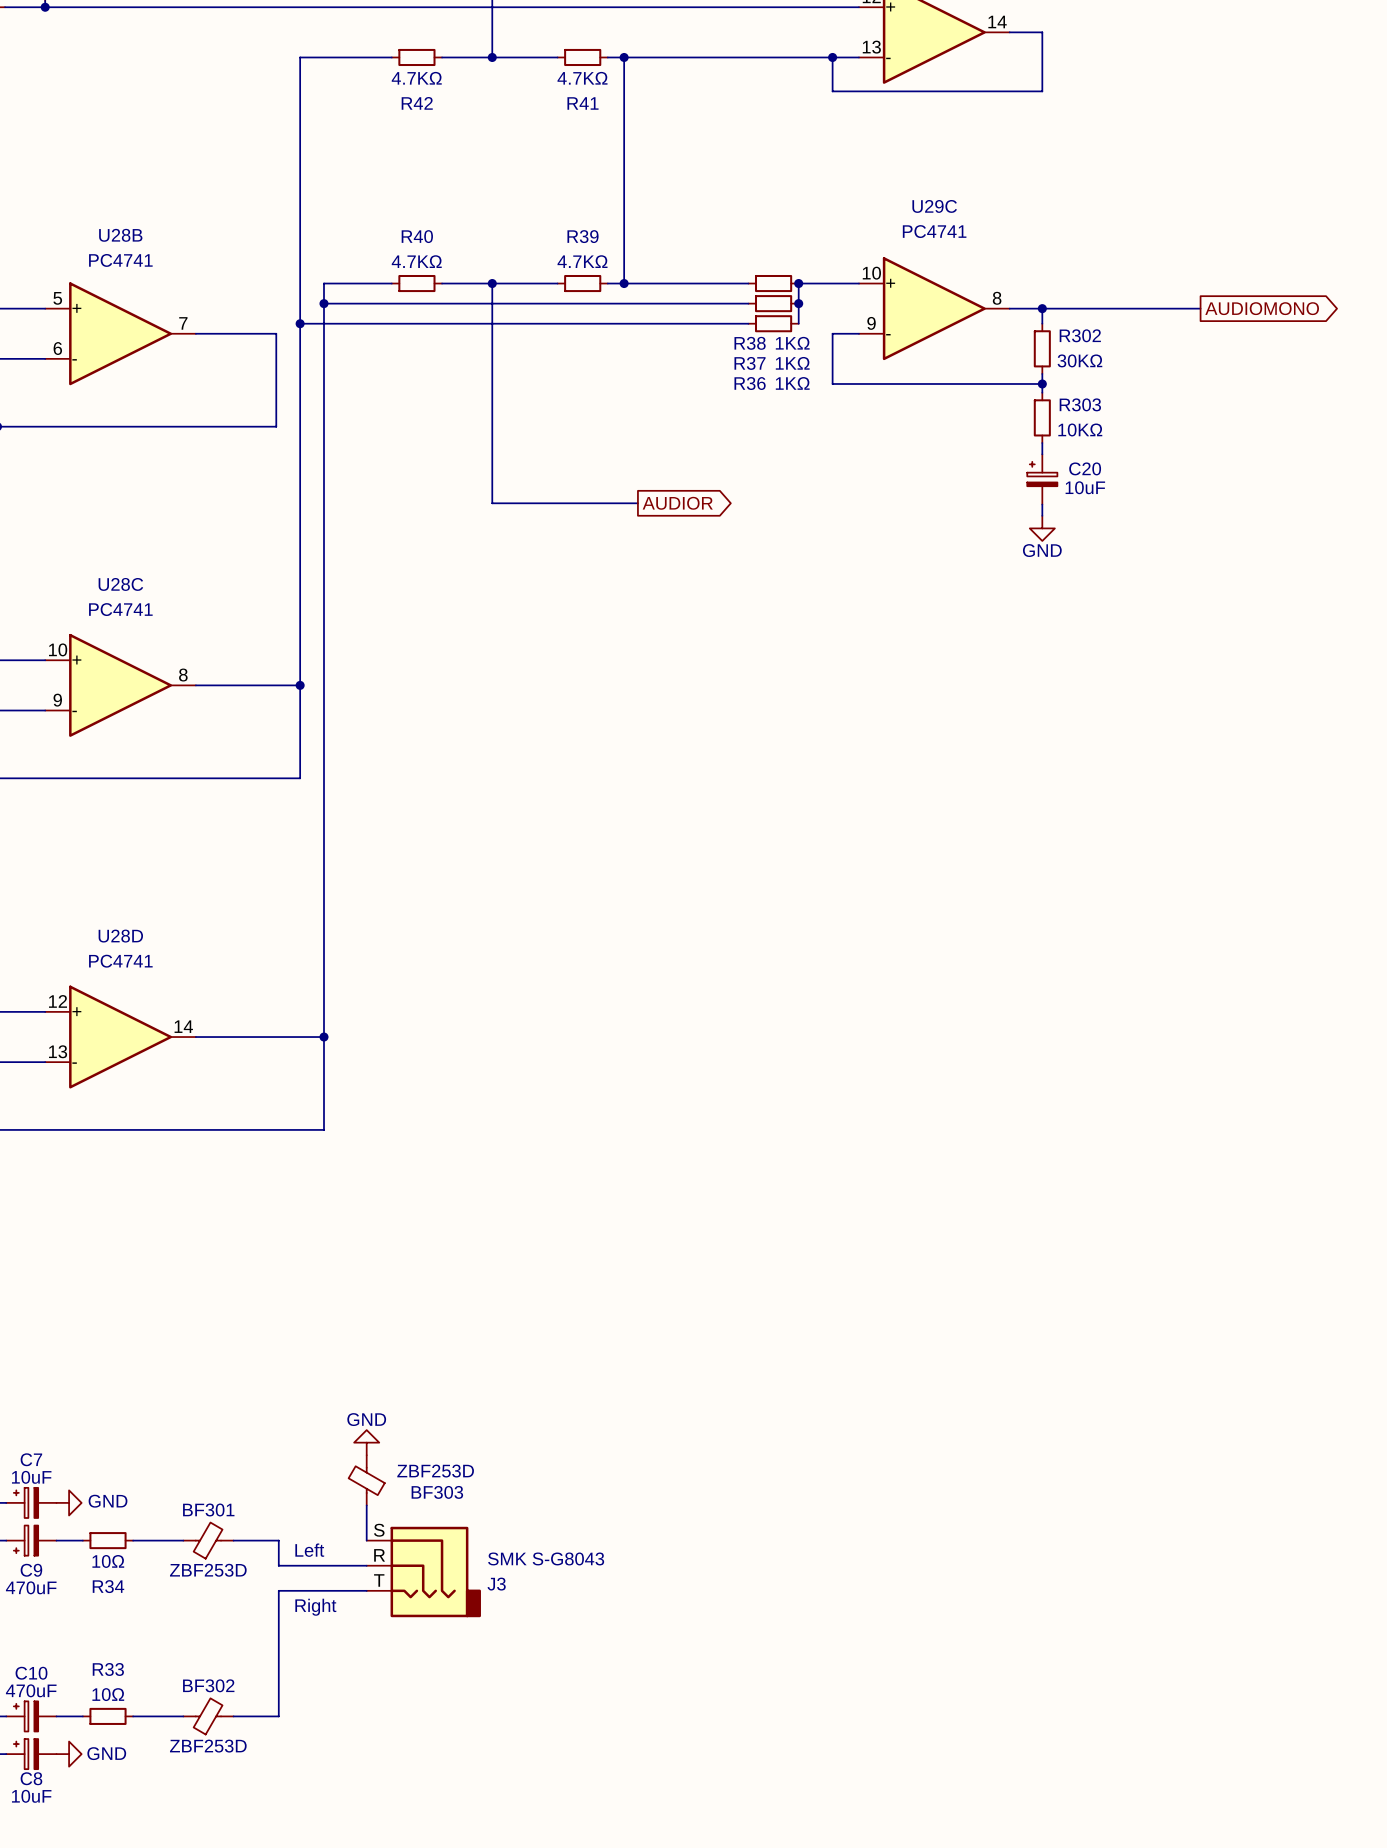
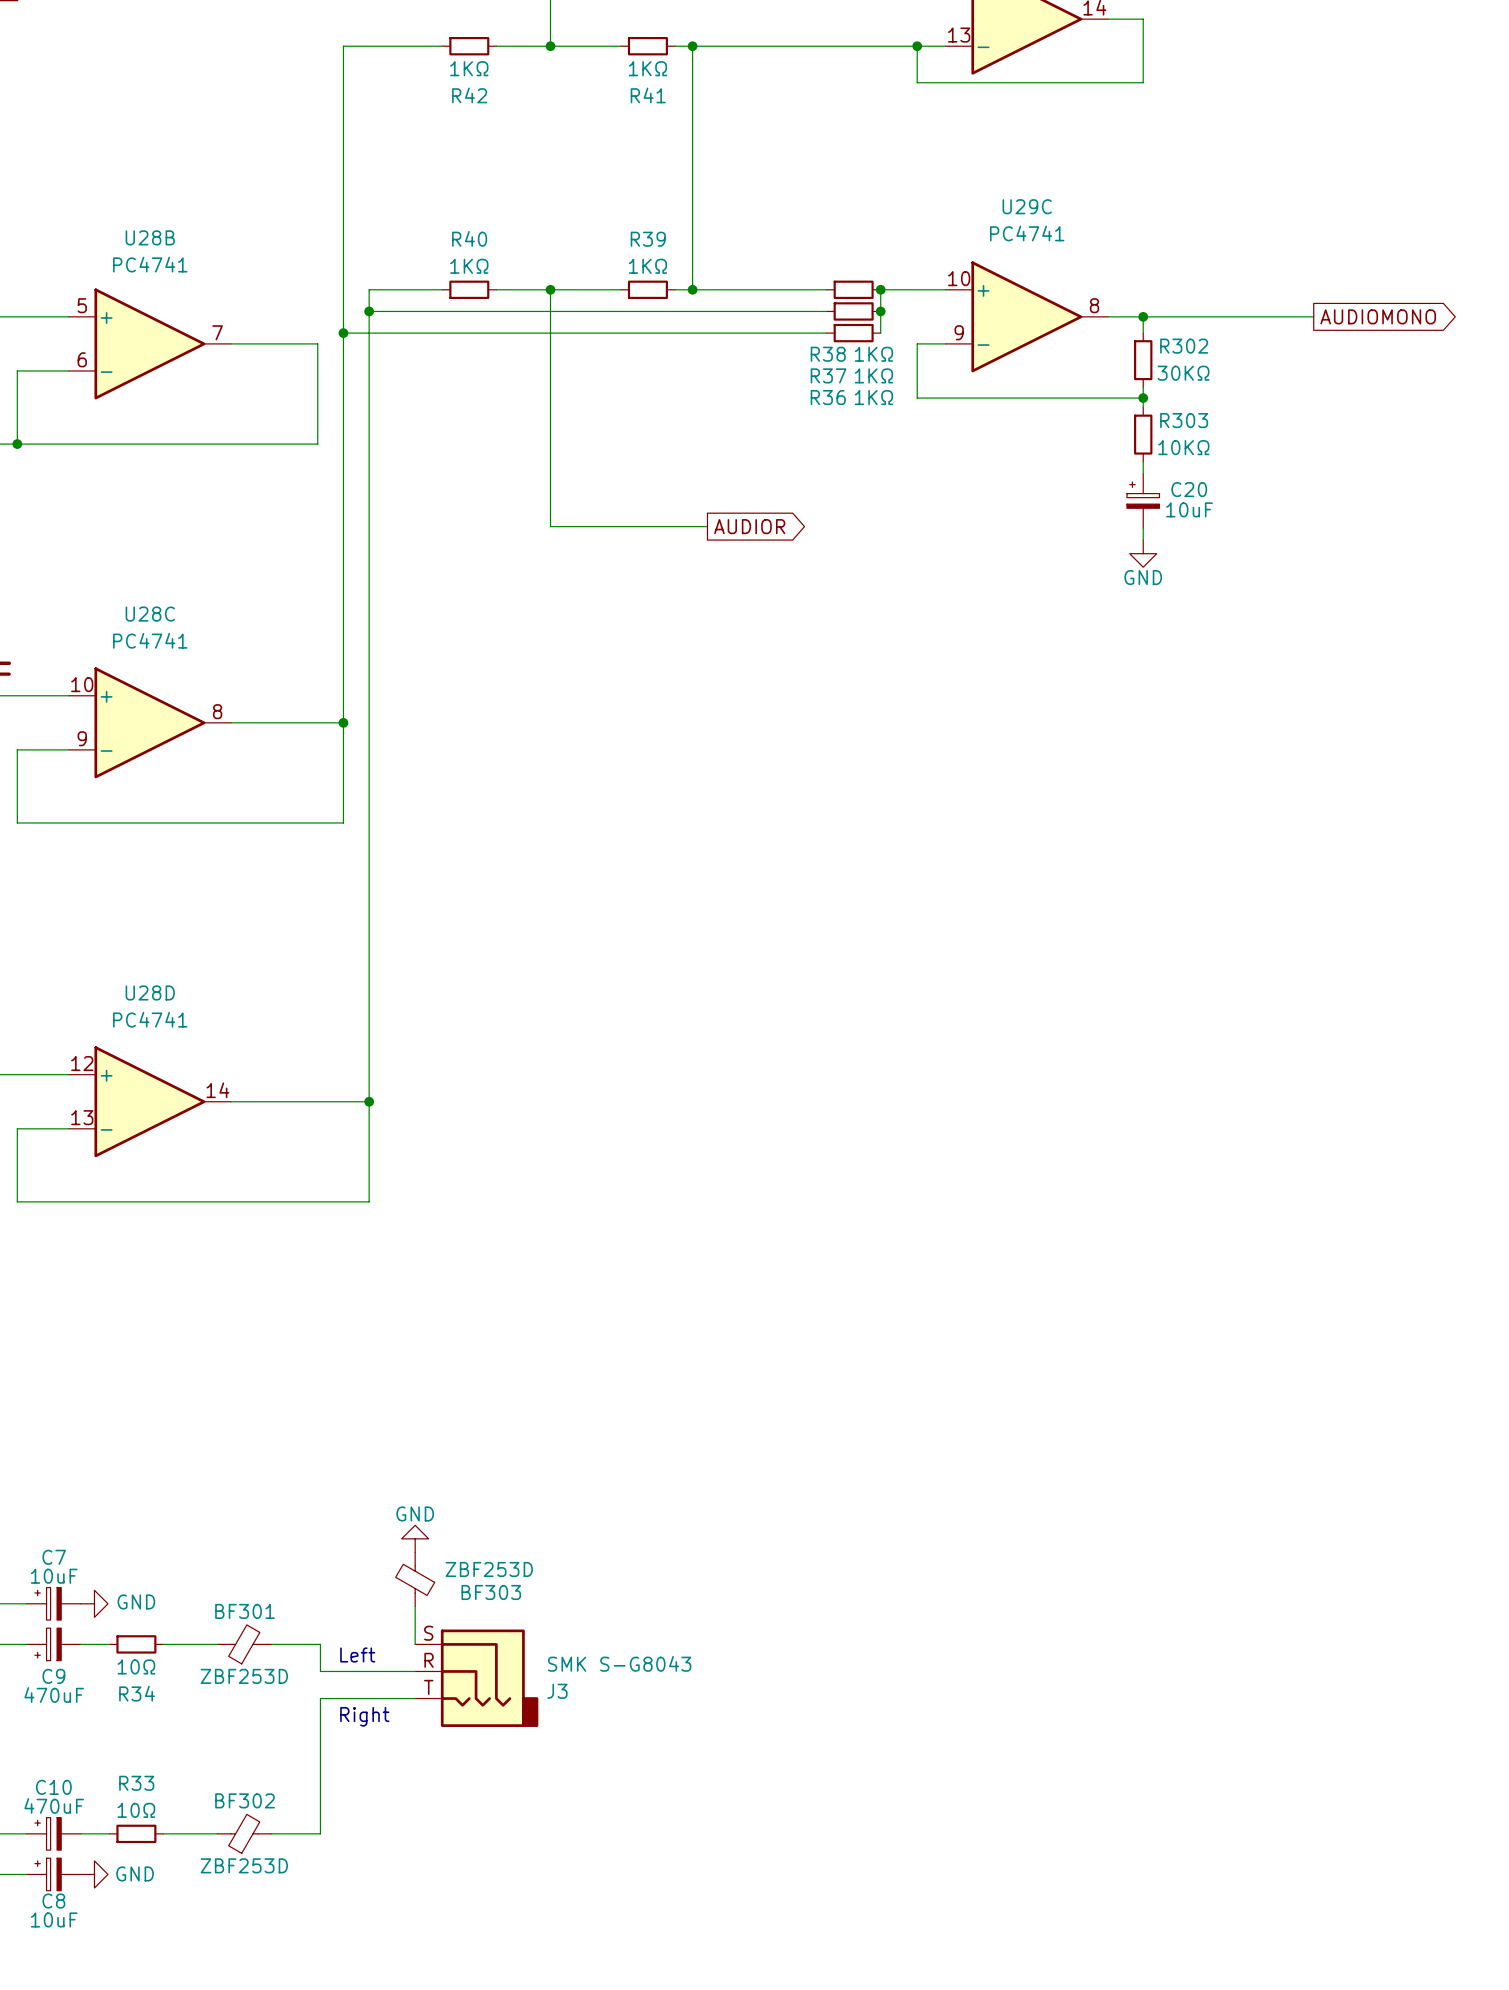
R42 value: 4.7KΩ (416, 78) -> 1KΩ (469, 68)
R41 value: 4.7KΩ (582, 78) -> 1KΩ (647, 68)
R40 value: 4.7KΩ (416, 261) -> 1KΩ (469, 266)
R39 value: 4.7KΩ (582, 261) -> 1KΩ (647, 266)

